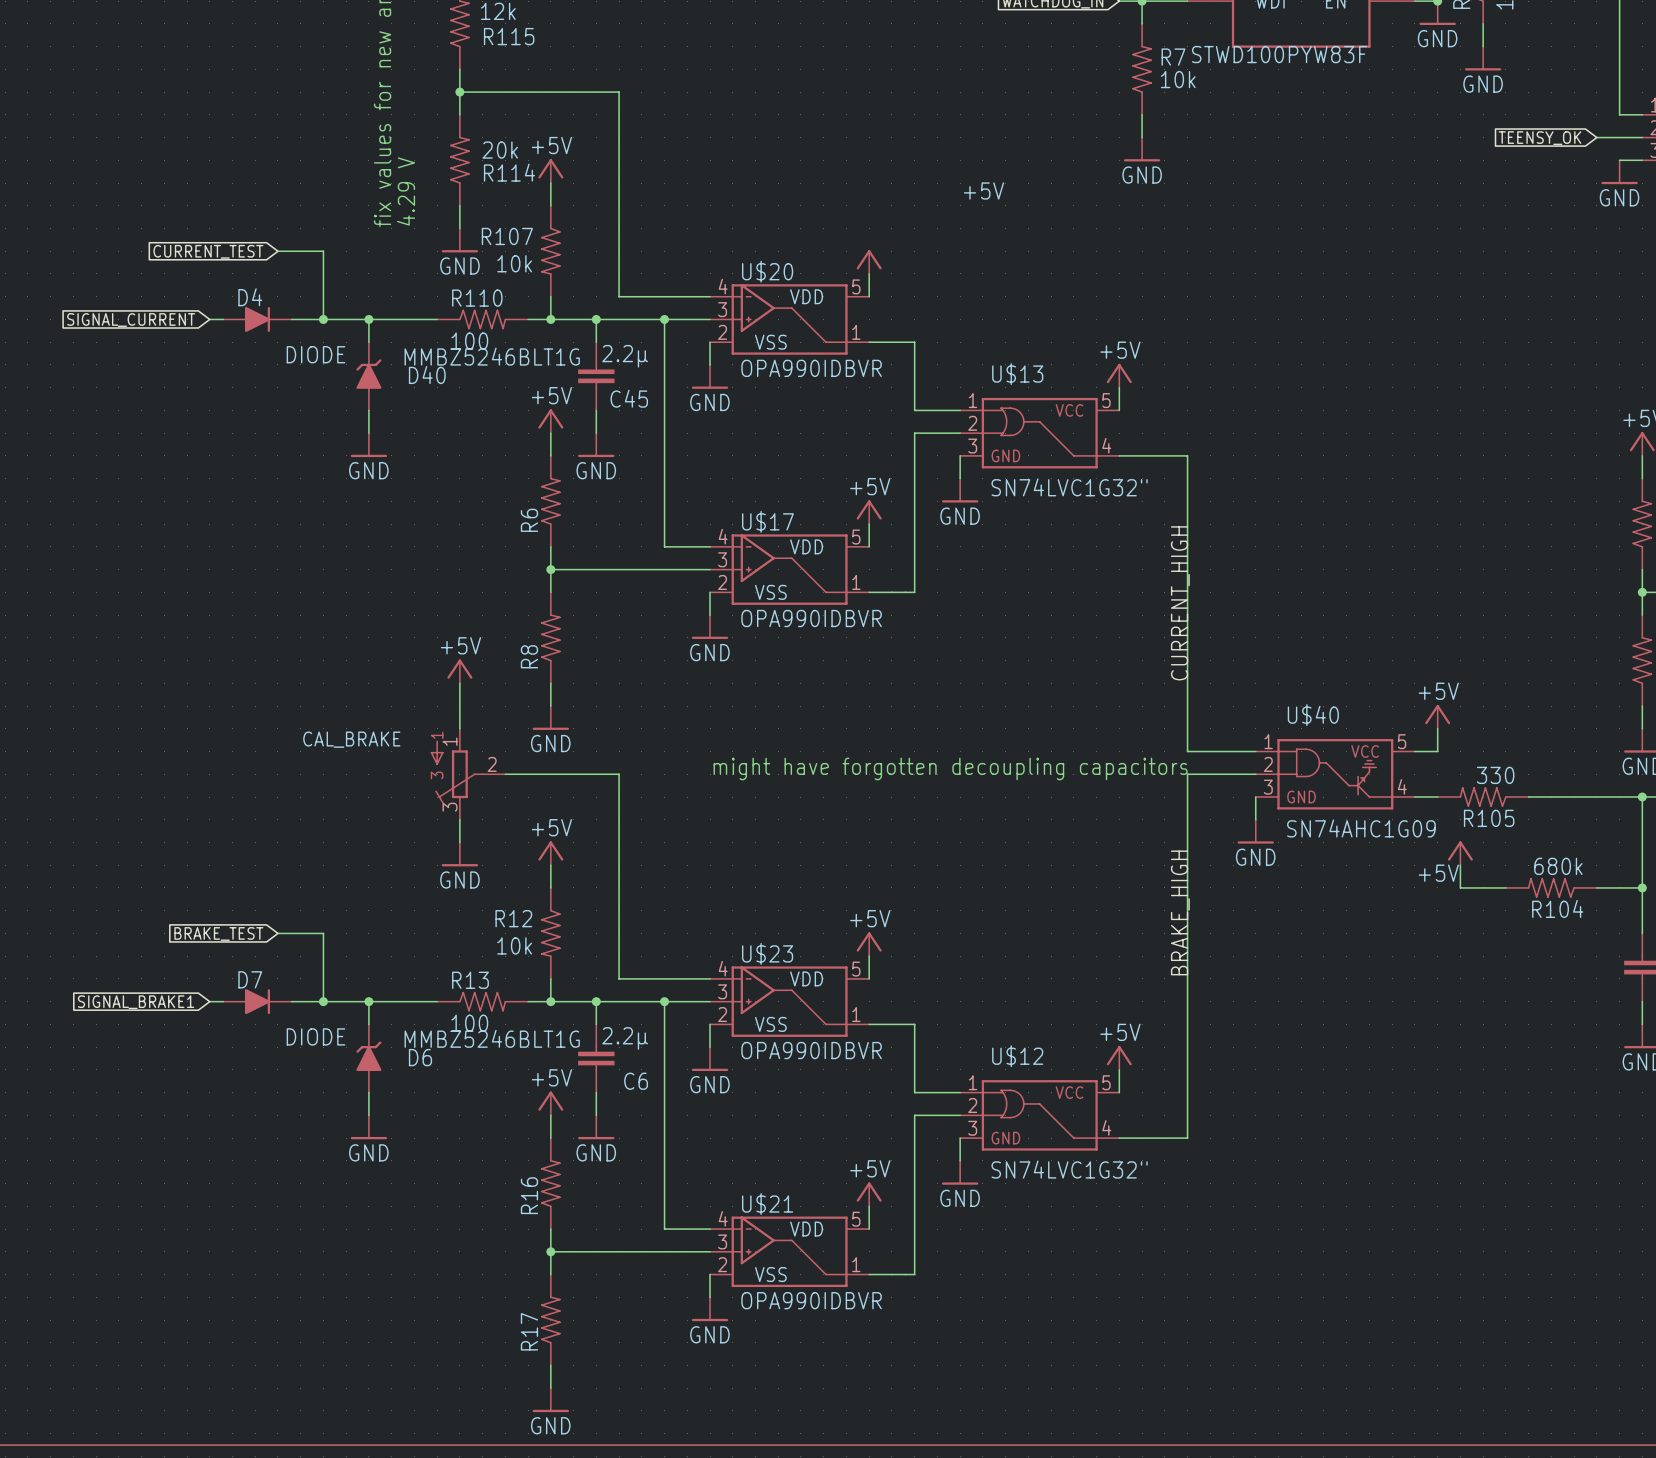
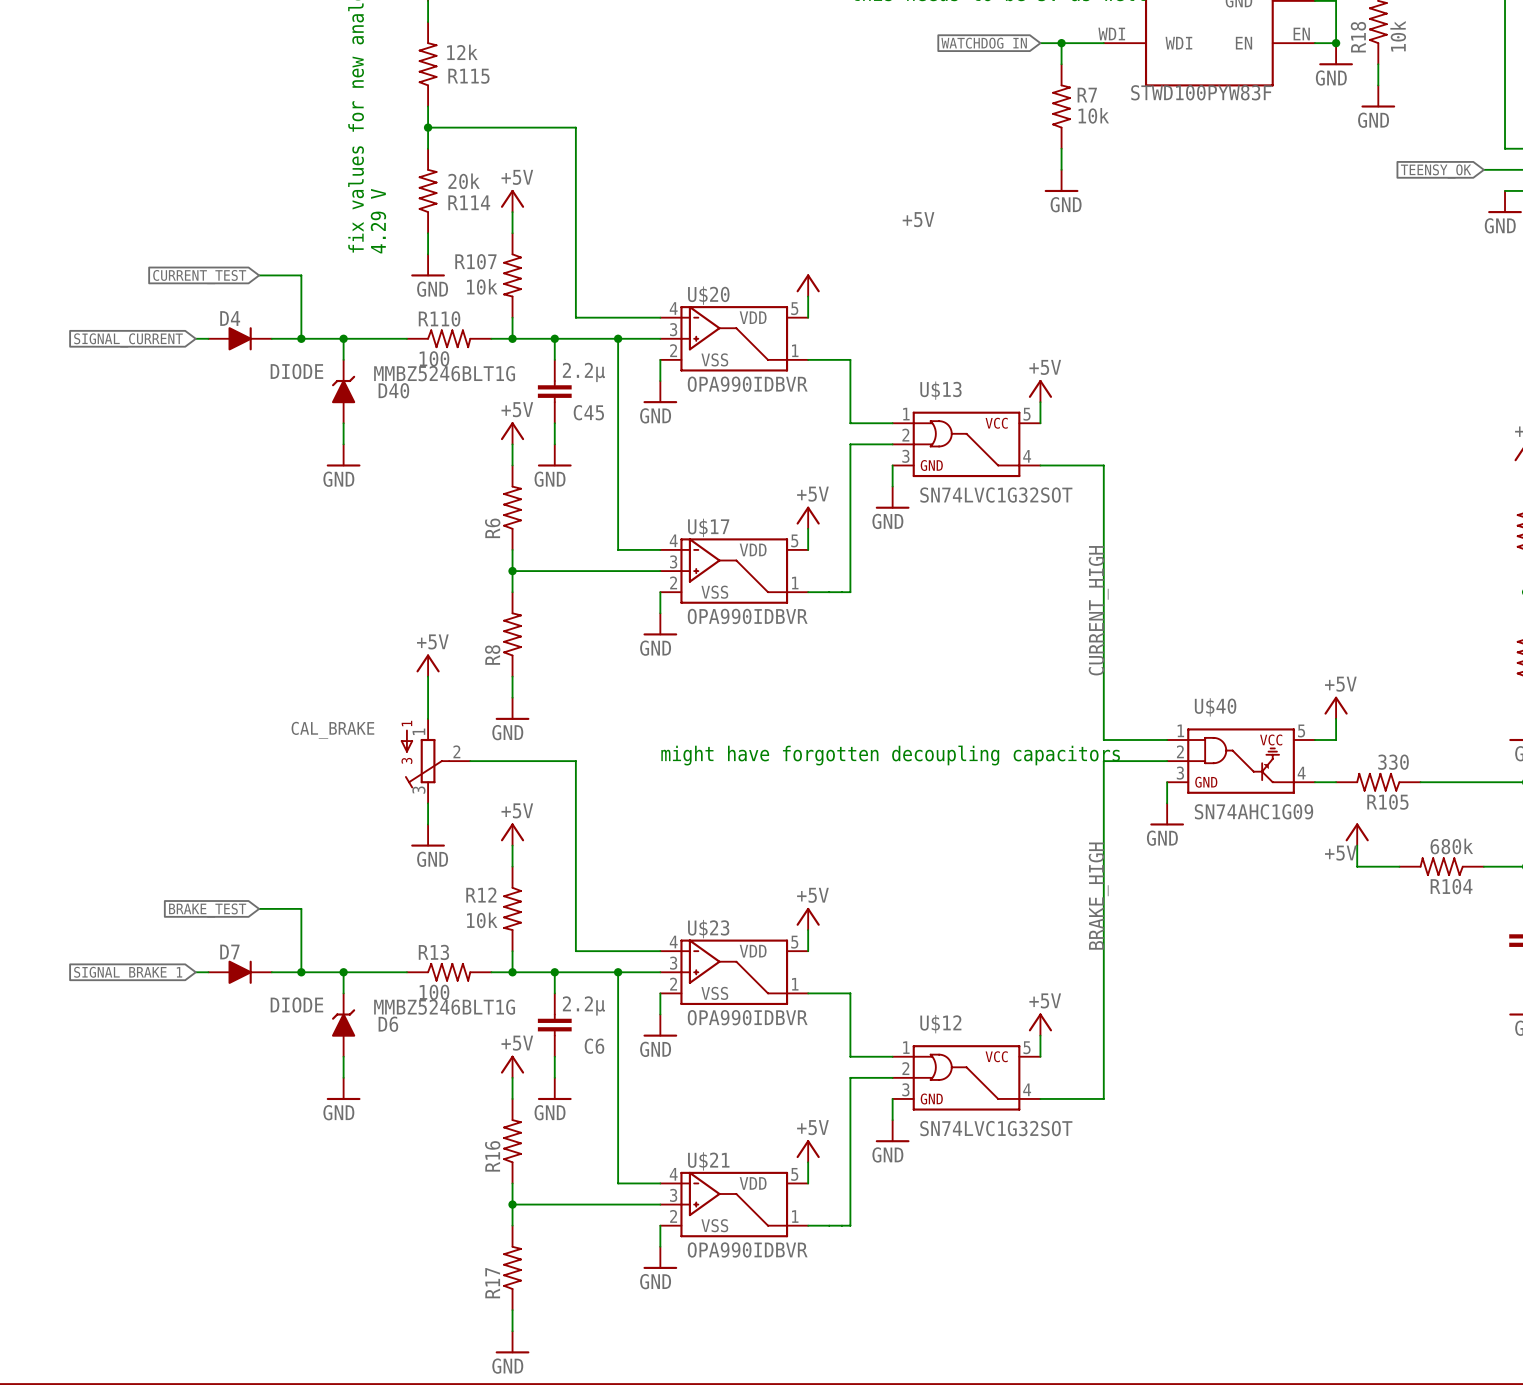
U$13 value: SN74LVC1G32" (1069, 487) -> SN74LVC1G32SOT (996, 495)
global label: SIGNAL_BRAKE1 (136, 1002) -> SIGNAL_BRAKE_1 (128, 973)
U$12 value: SN74LVC1G32" (1069, 1169) -> SN74LVC1G32SOT (996, 1128)

